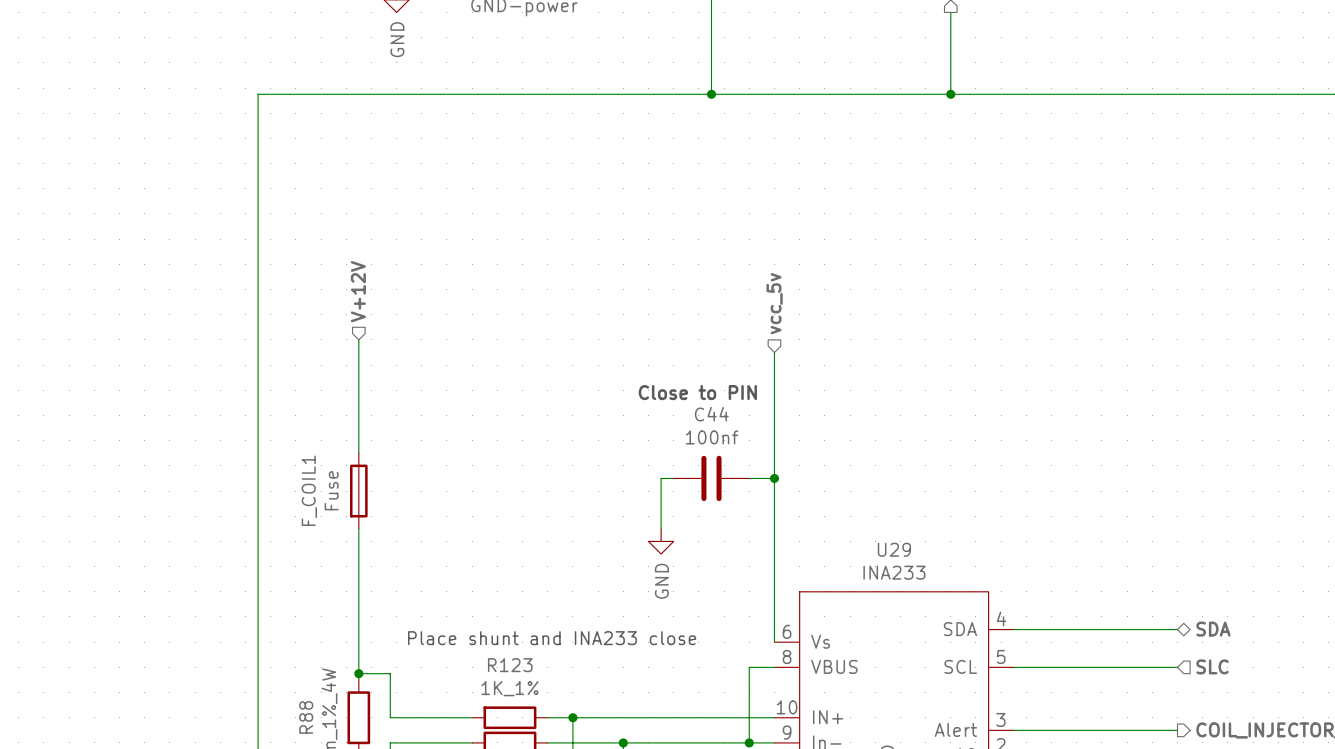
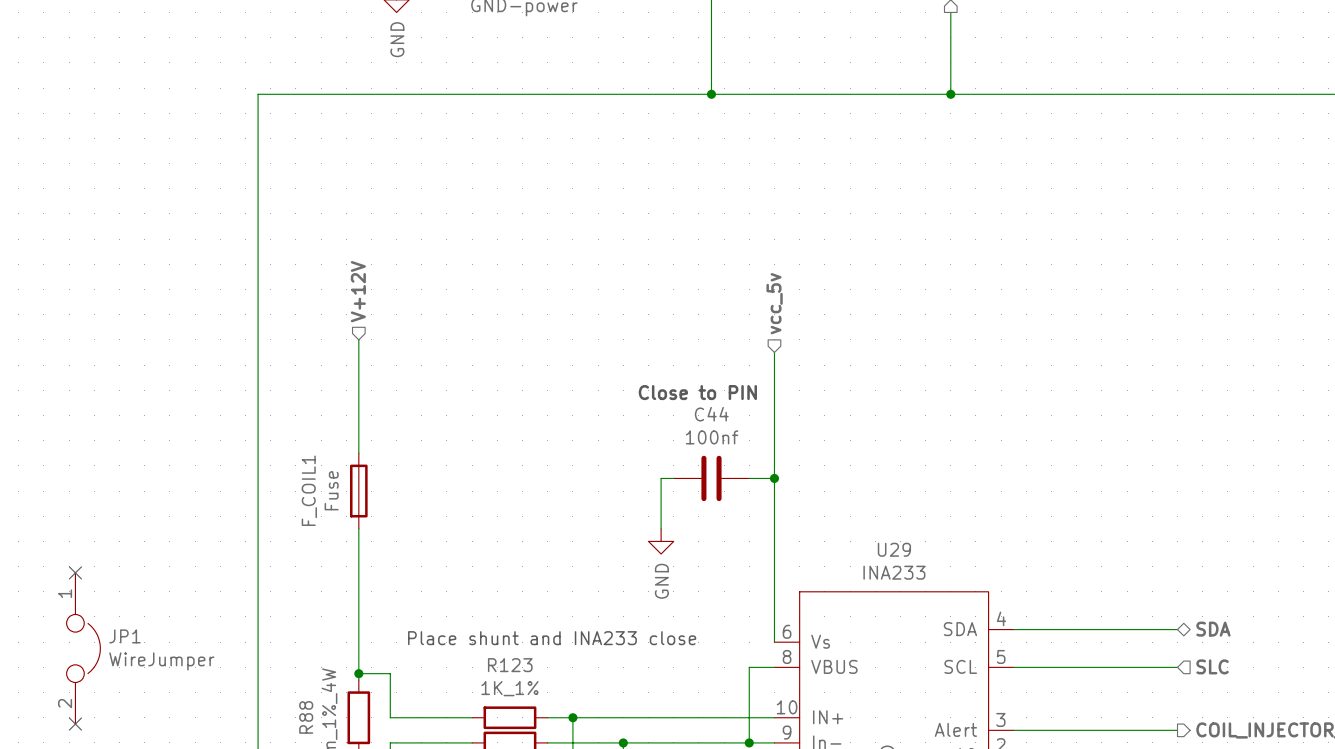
no-connect mark: none -> (75, 572)
JP1: none -> WireJumper (83, 648)
no-connect mark: none -> (75, 724)

